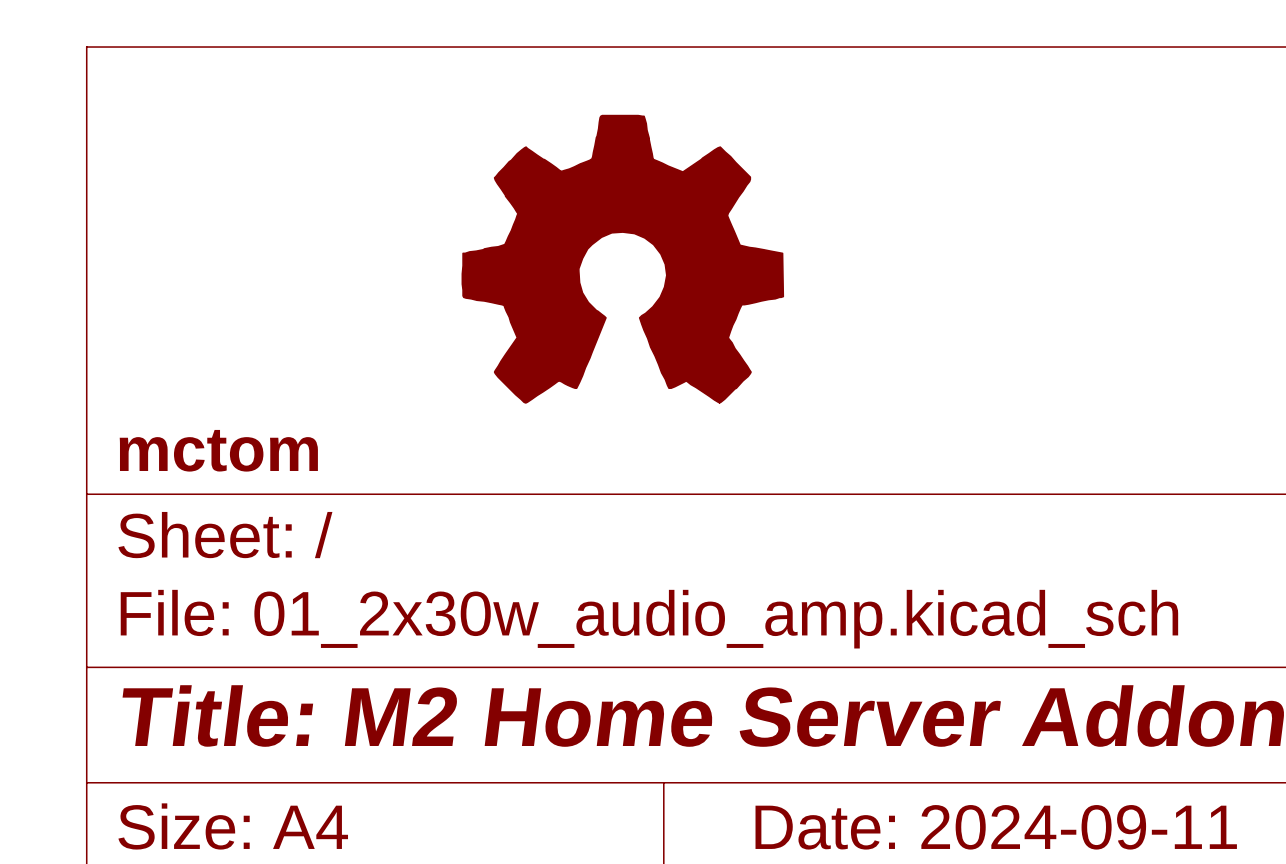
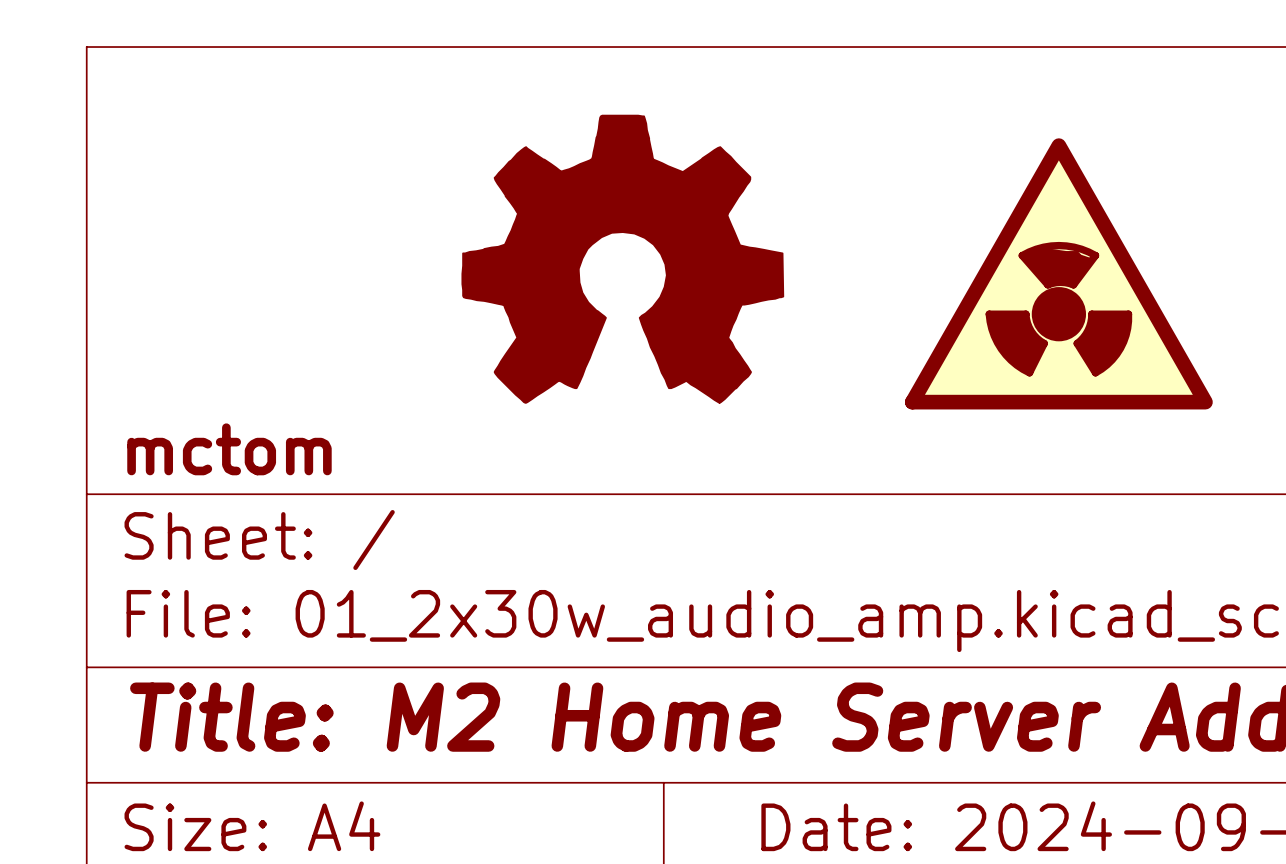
part: none -> (1058, 273)

